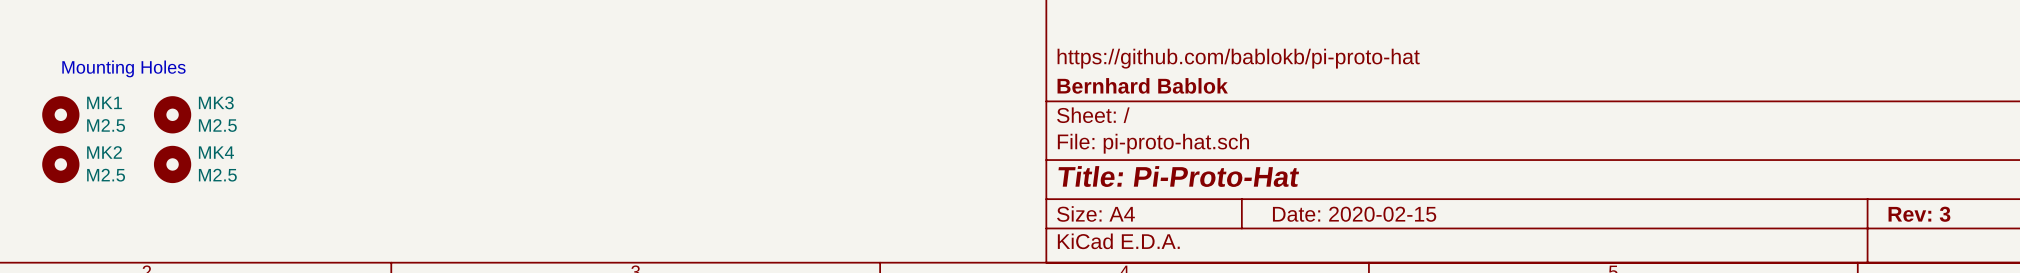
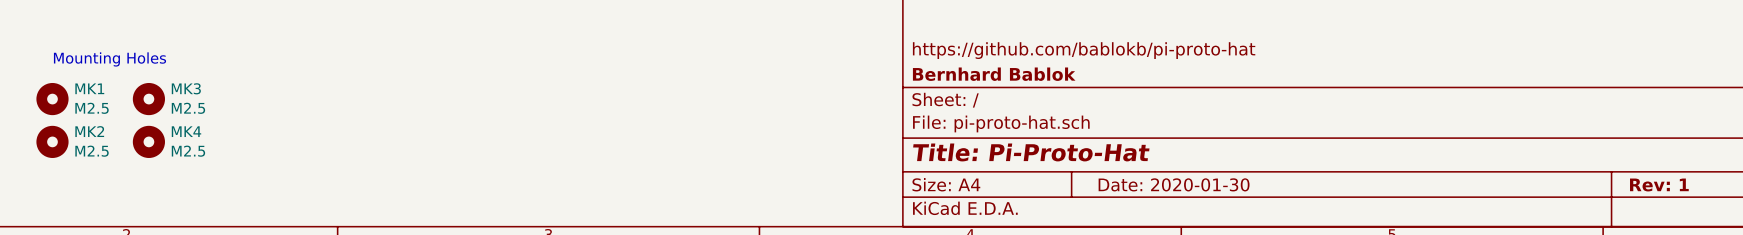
title block: Date: 2020-02-15 (1354, 214) -> Date: 2020-01-30 (1174, 184)
title block: Rev: 3 (1919, 214) -> Rev: 1 (1659, 184)

